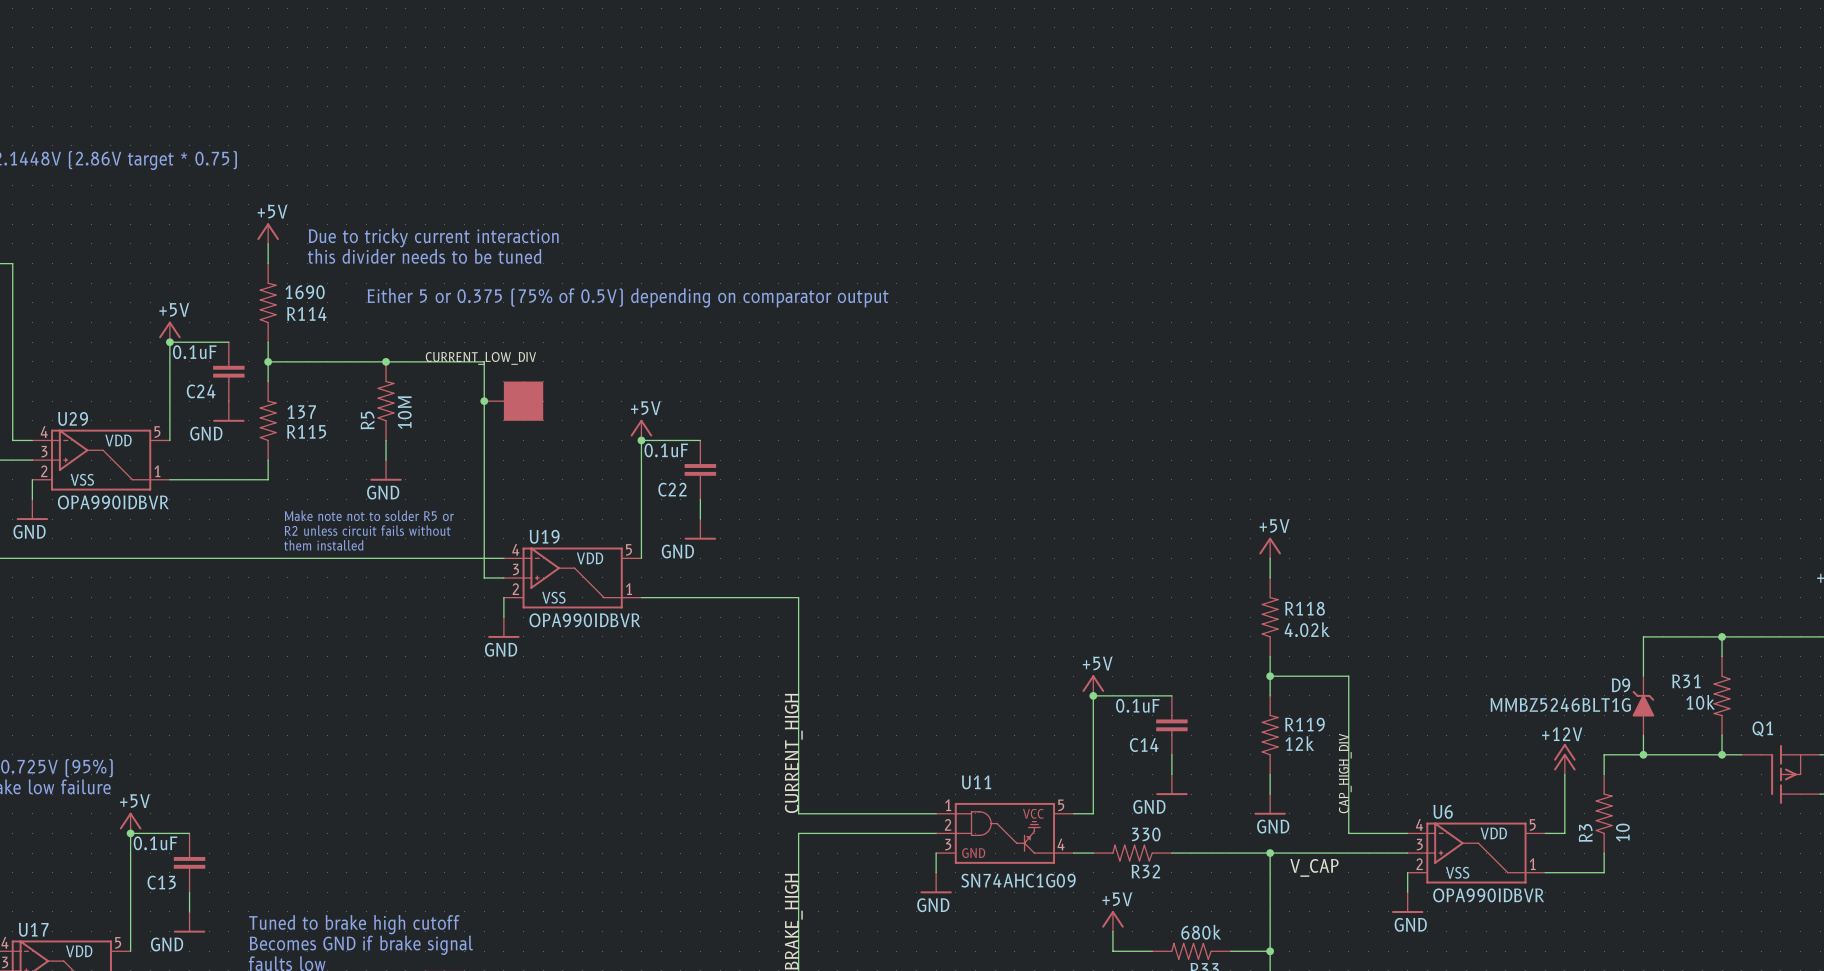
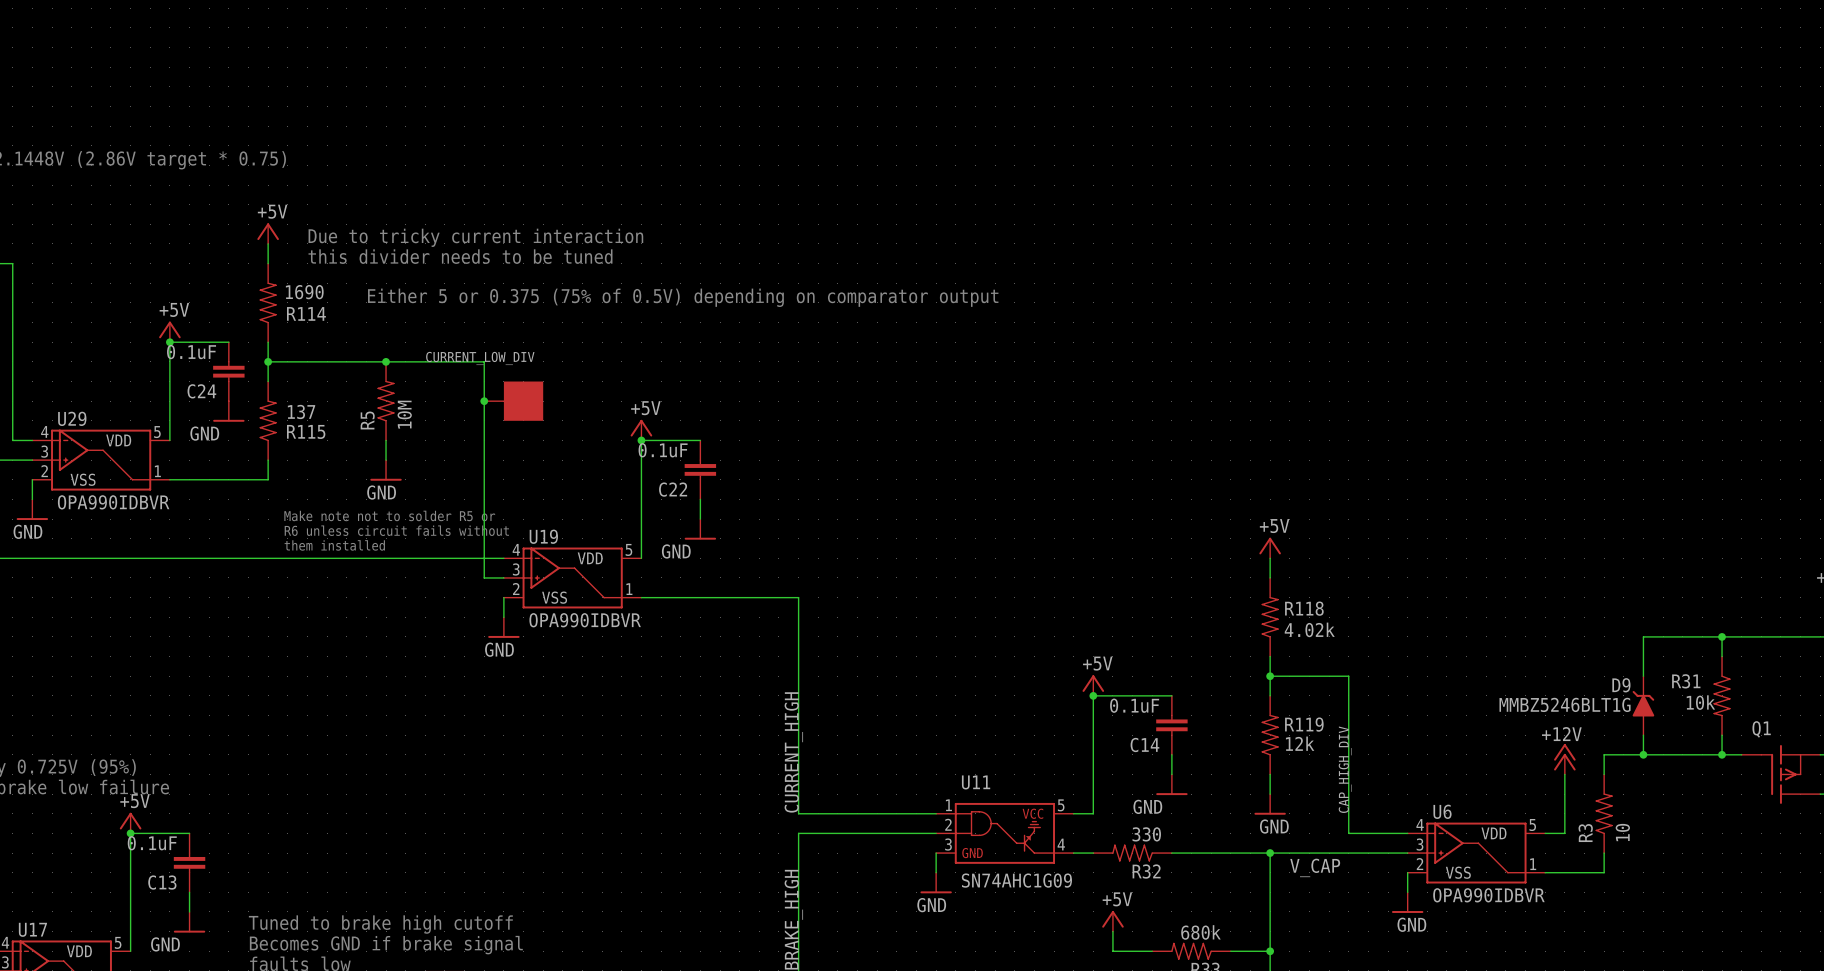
text: R2 unless circuit fails without (367, 530) -> R6 unless circuit fails without (396, 530)

